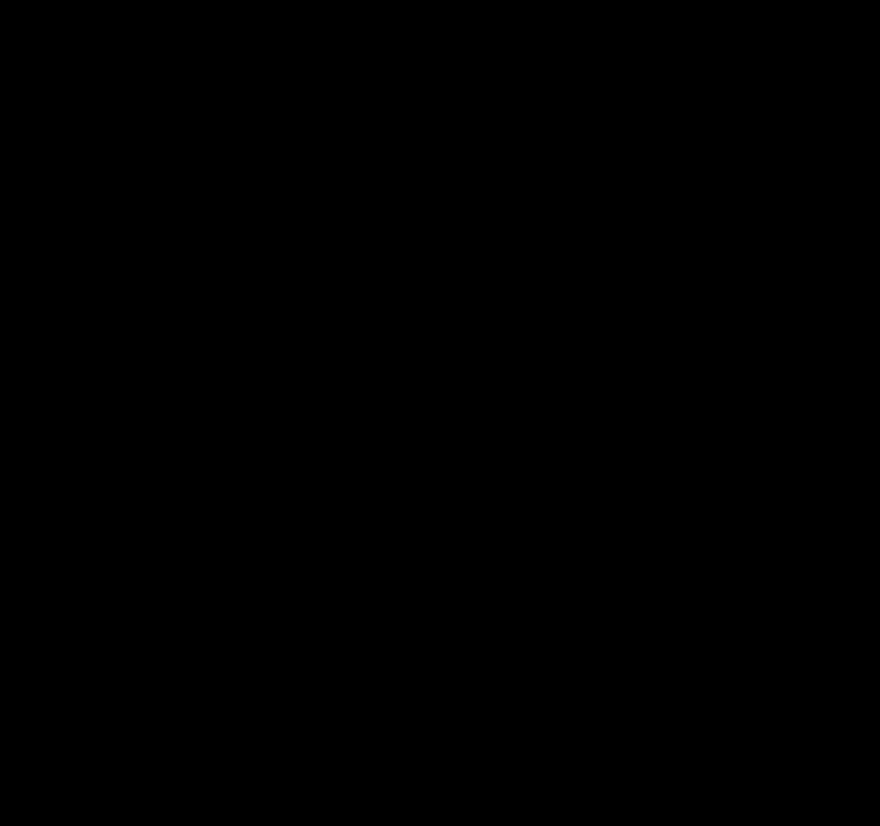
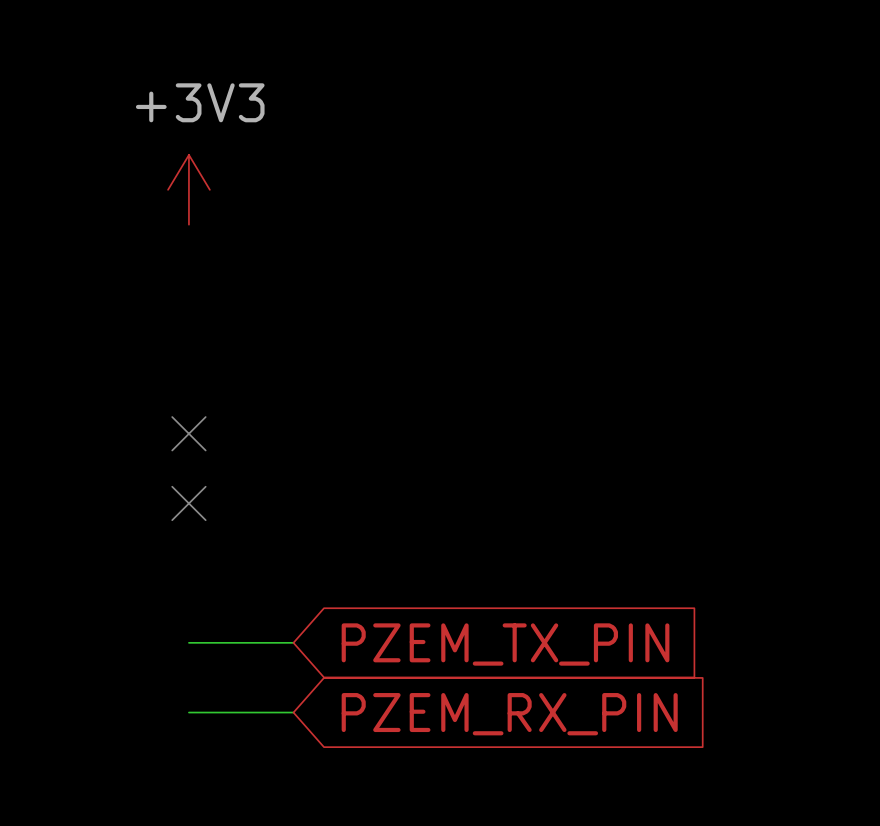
power symbol: none -> +3V3 (188, 189)
no-connect mark: none -> (188, 433)
no-connect mark: none -> (188, 503)
wire: none -> (188, 642) (293, 642)
global label: none -> PZEM_TX_PIN (505, 644)
wire: none -> (188, 712) (293, 712)
global label: none -> PZEM_RX_PIN (509, 714)

